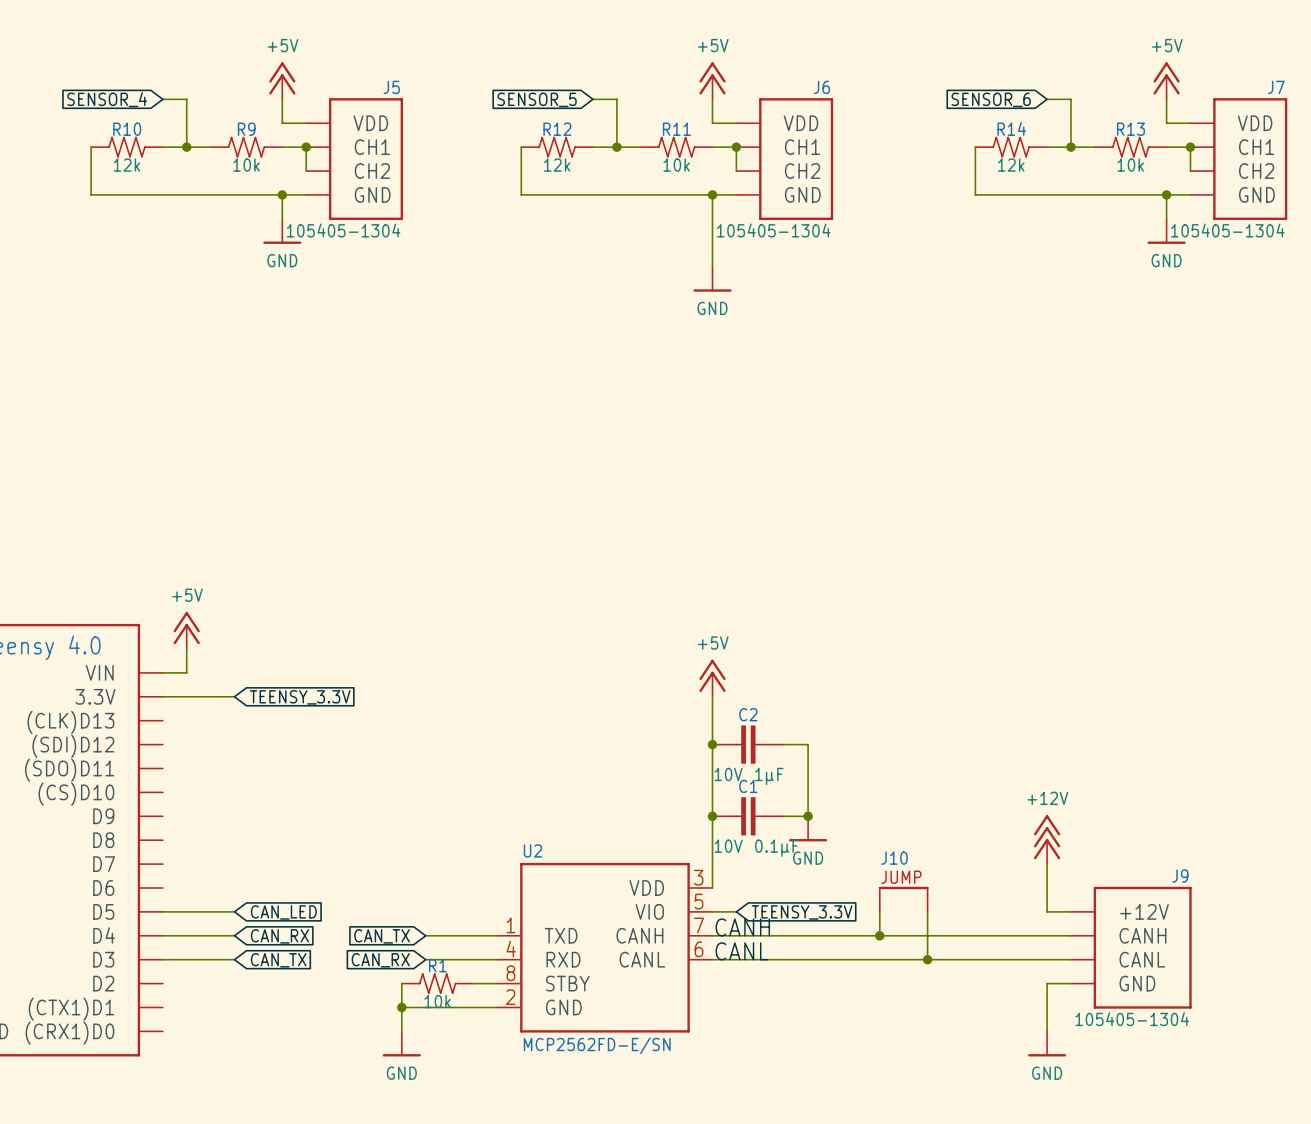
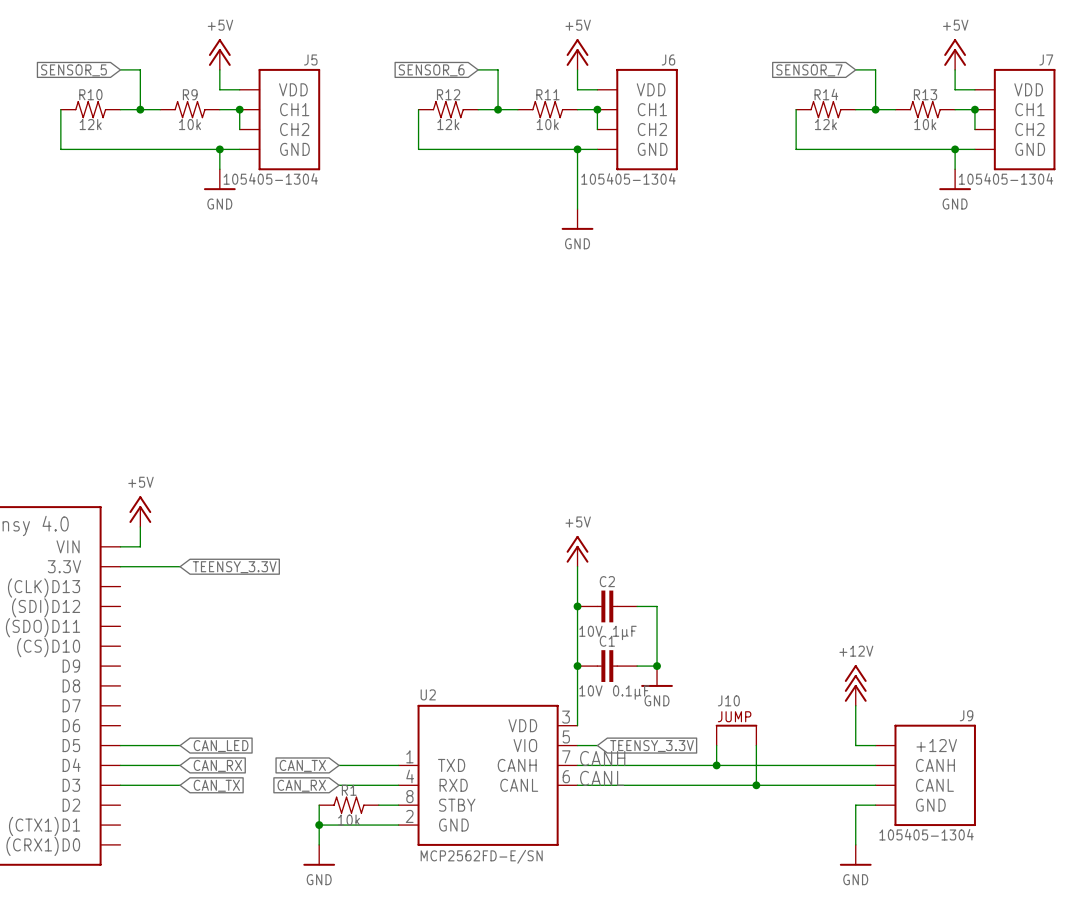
global label: SENSOR_4 (107, 99) -> SENSOR_5 (73, 70)
global label: SENSOR_5 (537, 99) -> SENSOR_6 (431, 70)
global label: SENSOR_6 (991, 99) -> SENSOR_7 (809, 70)

